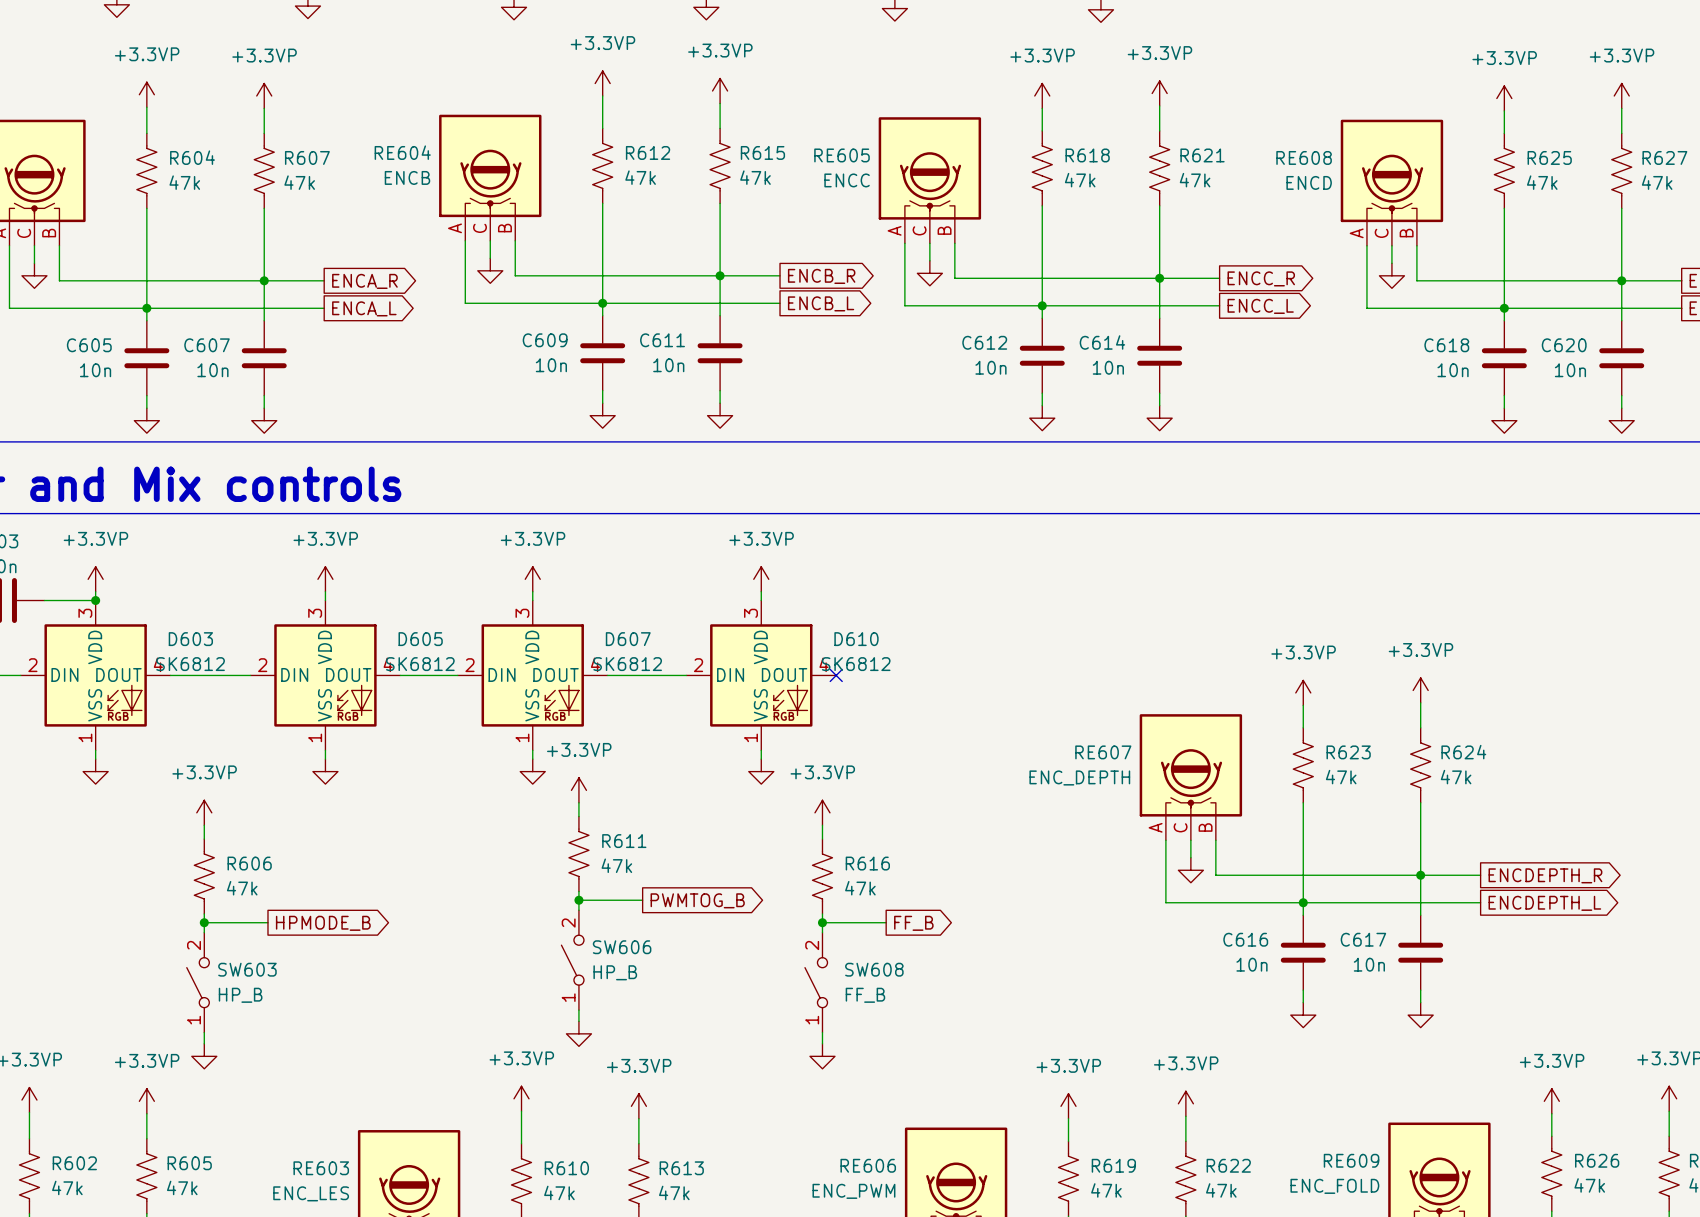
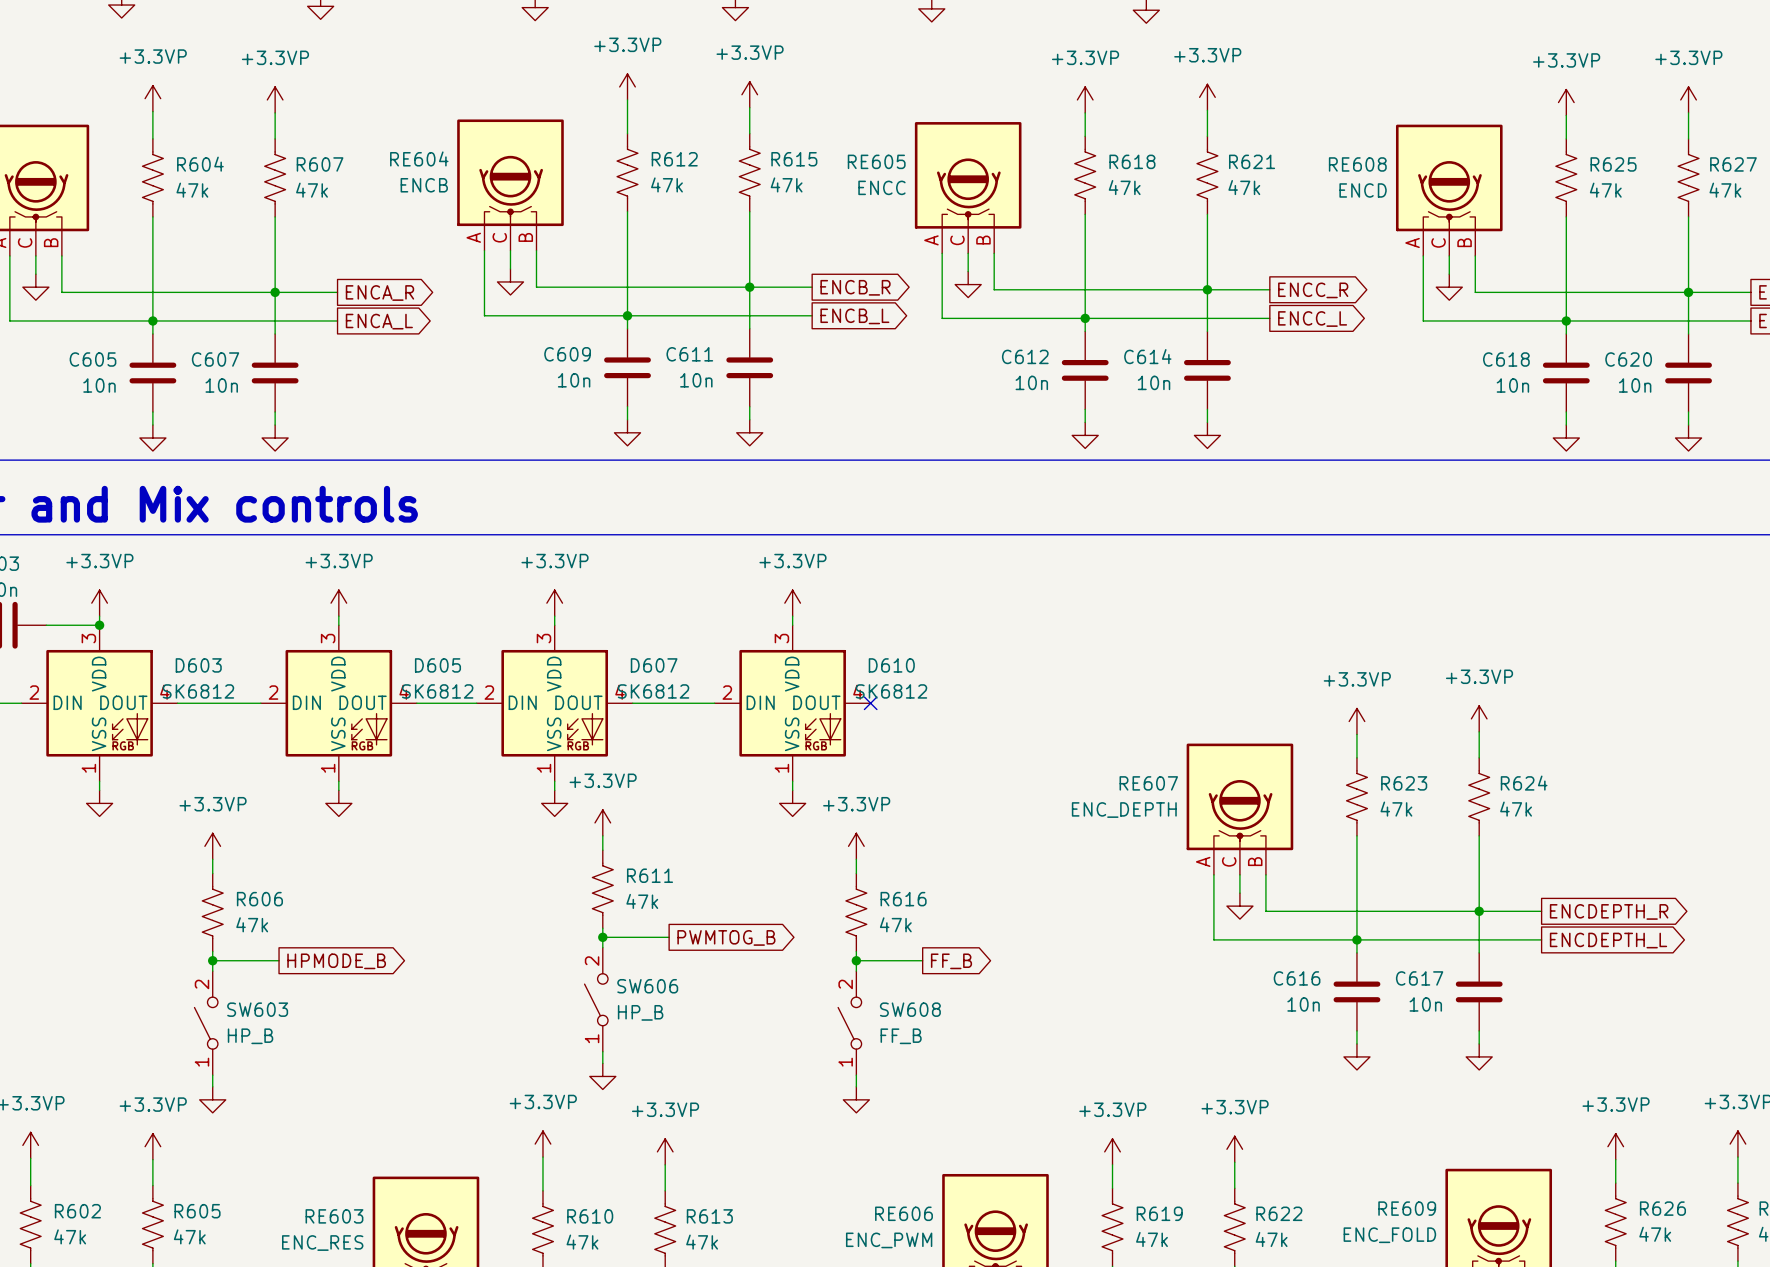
RE603 value: ENC_LES (311, 1193) -> ENC_RES (322, 1243)

